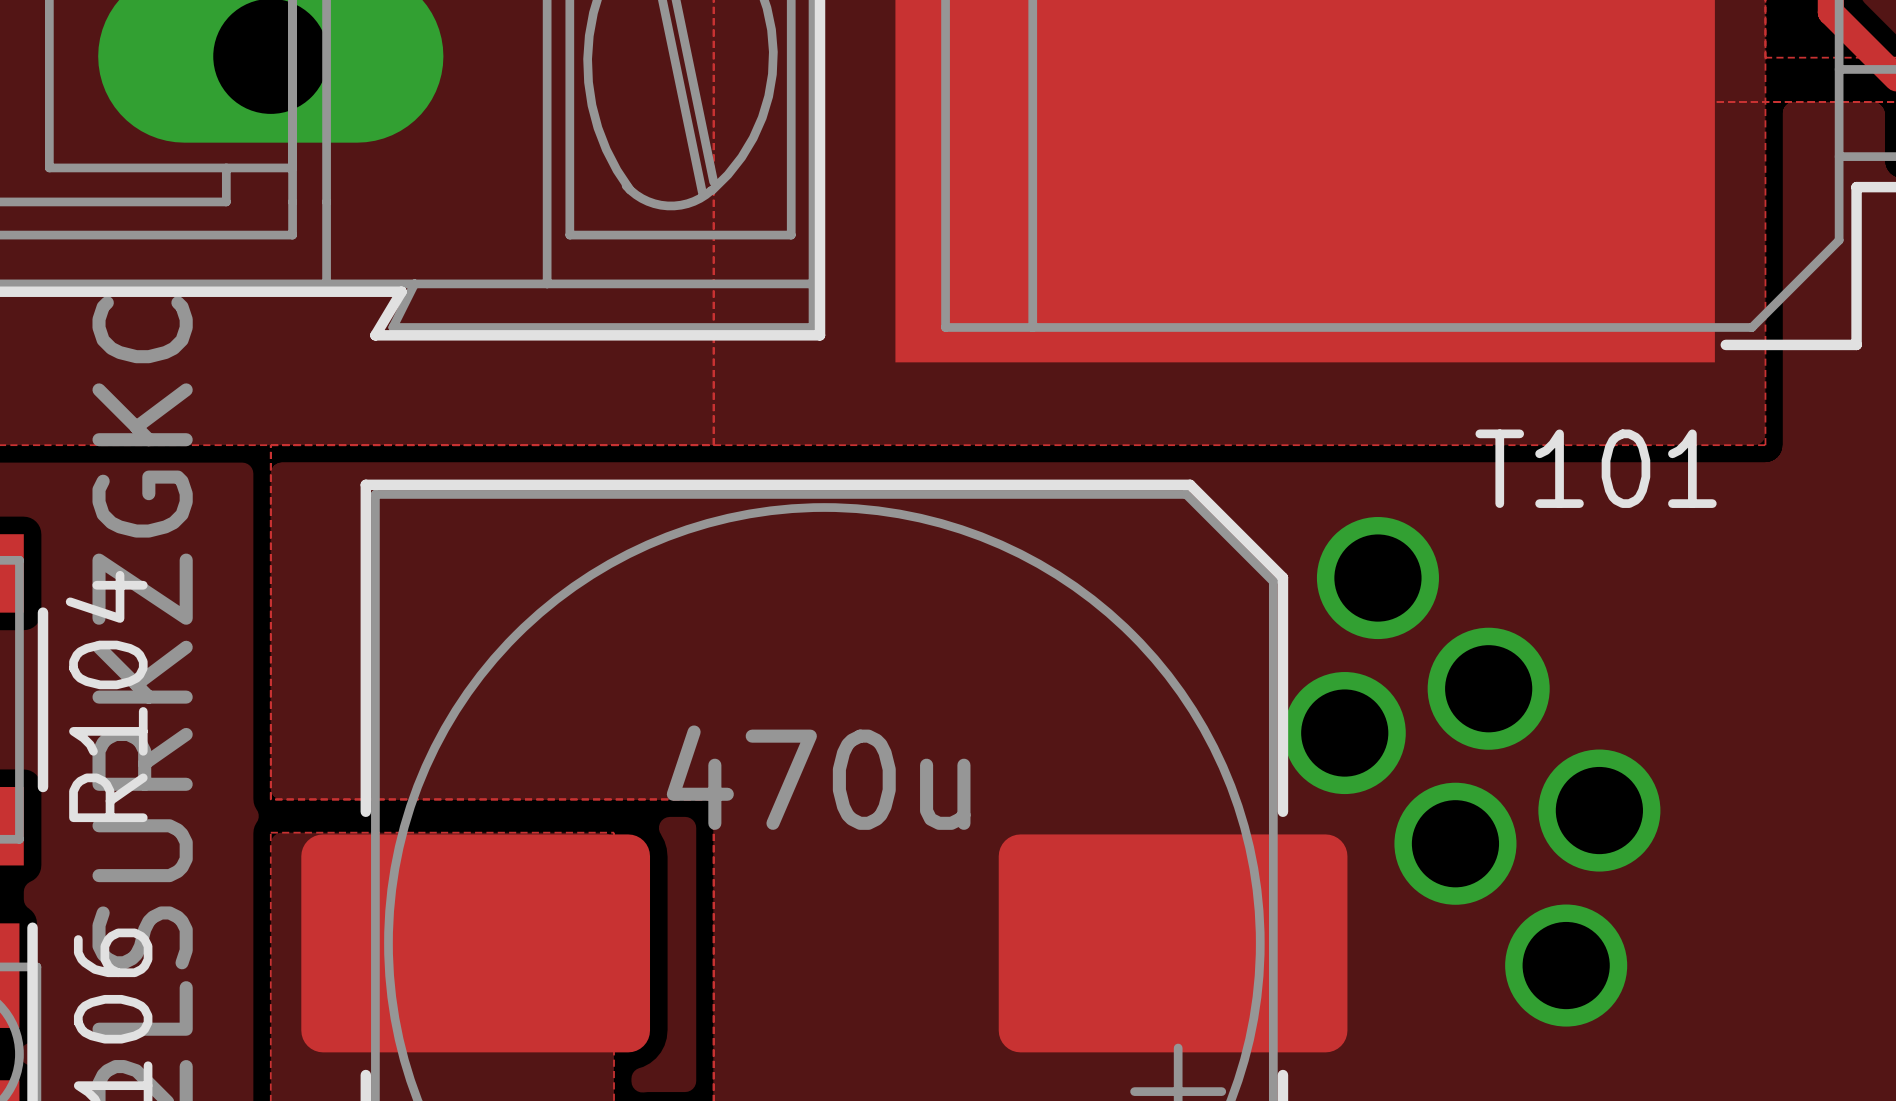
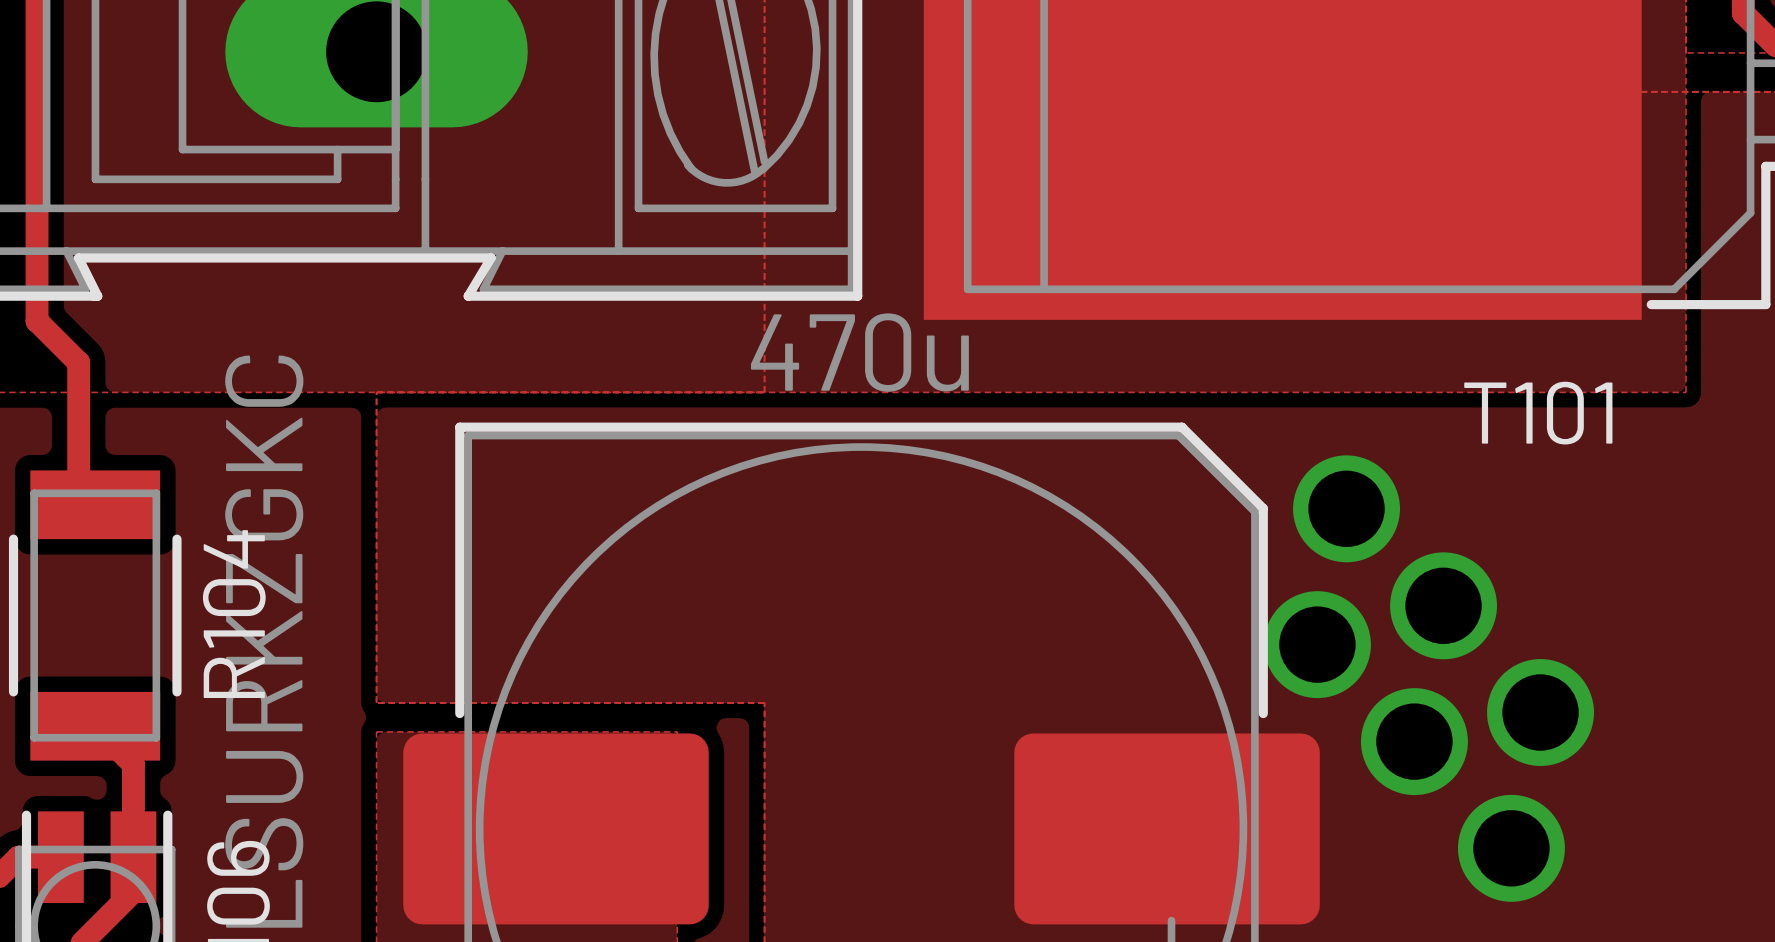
part value position: 470u (818, 777) -> 470u (859, 352)

